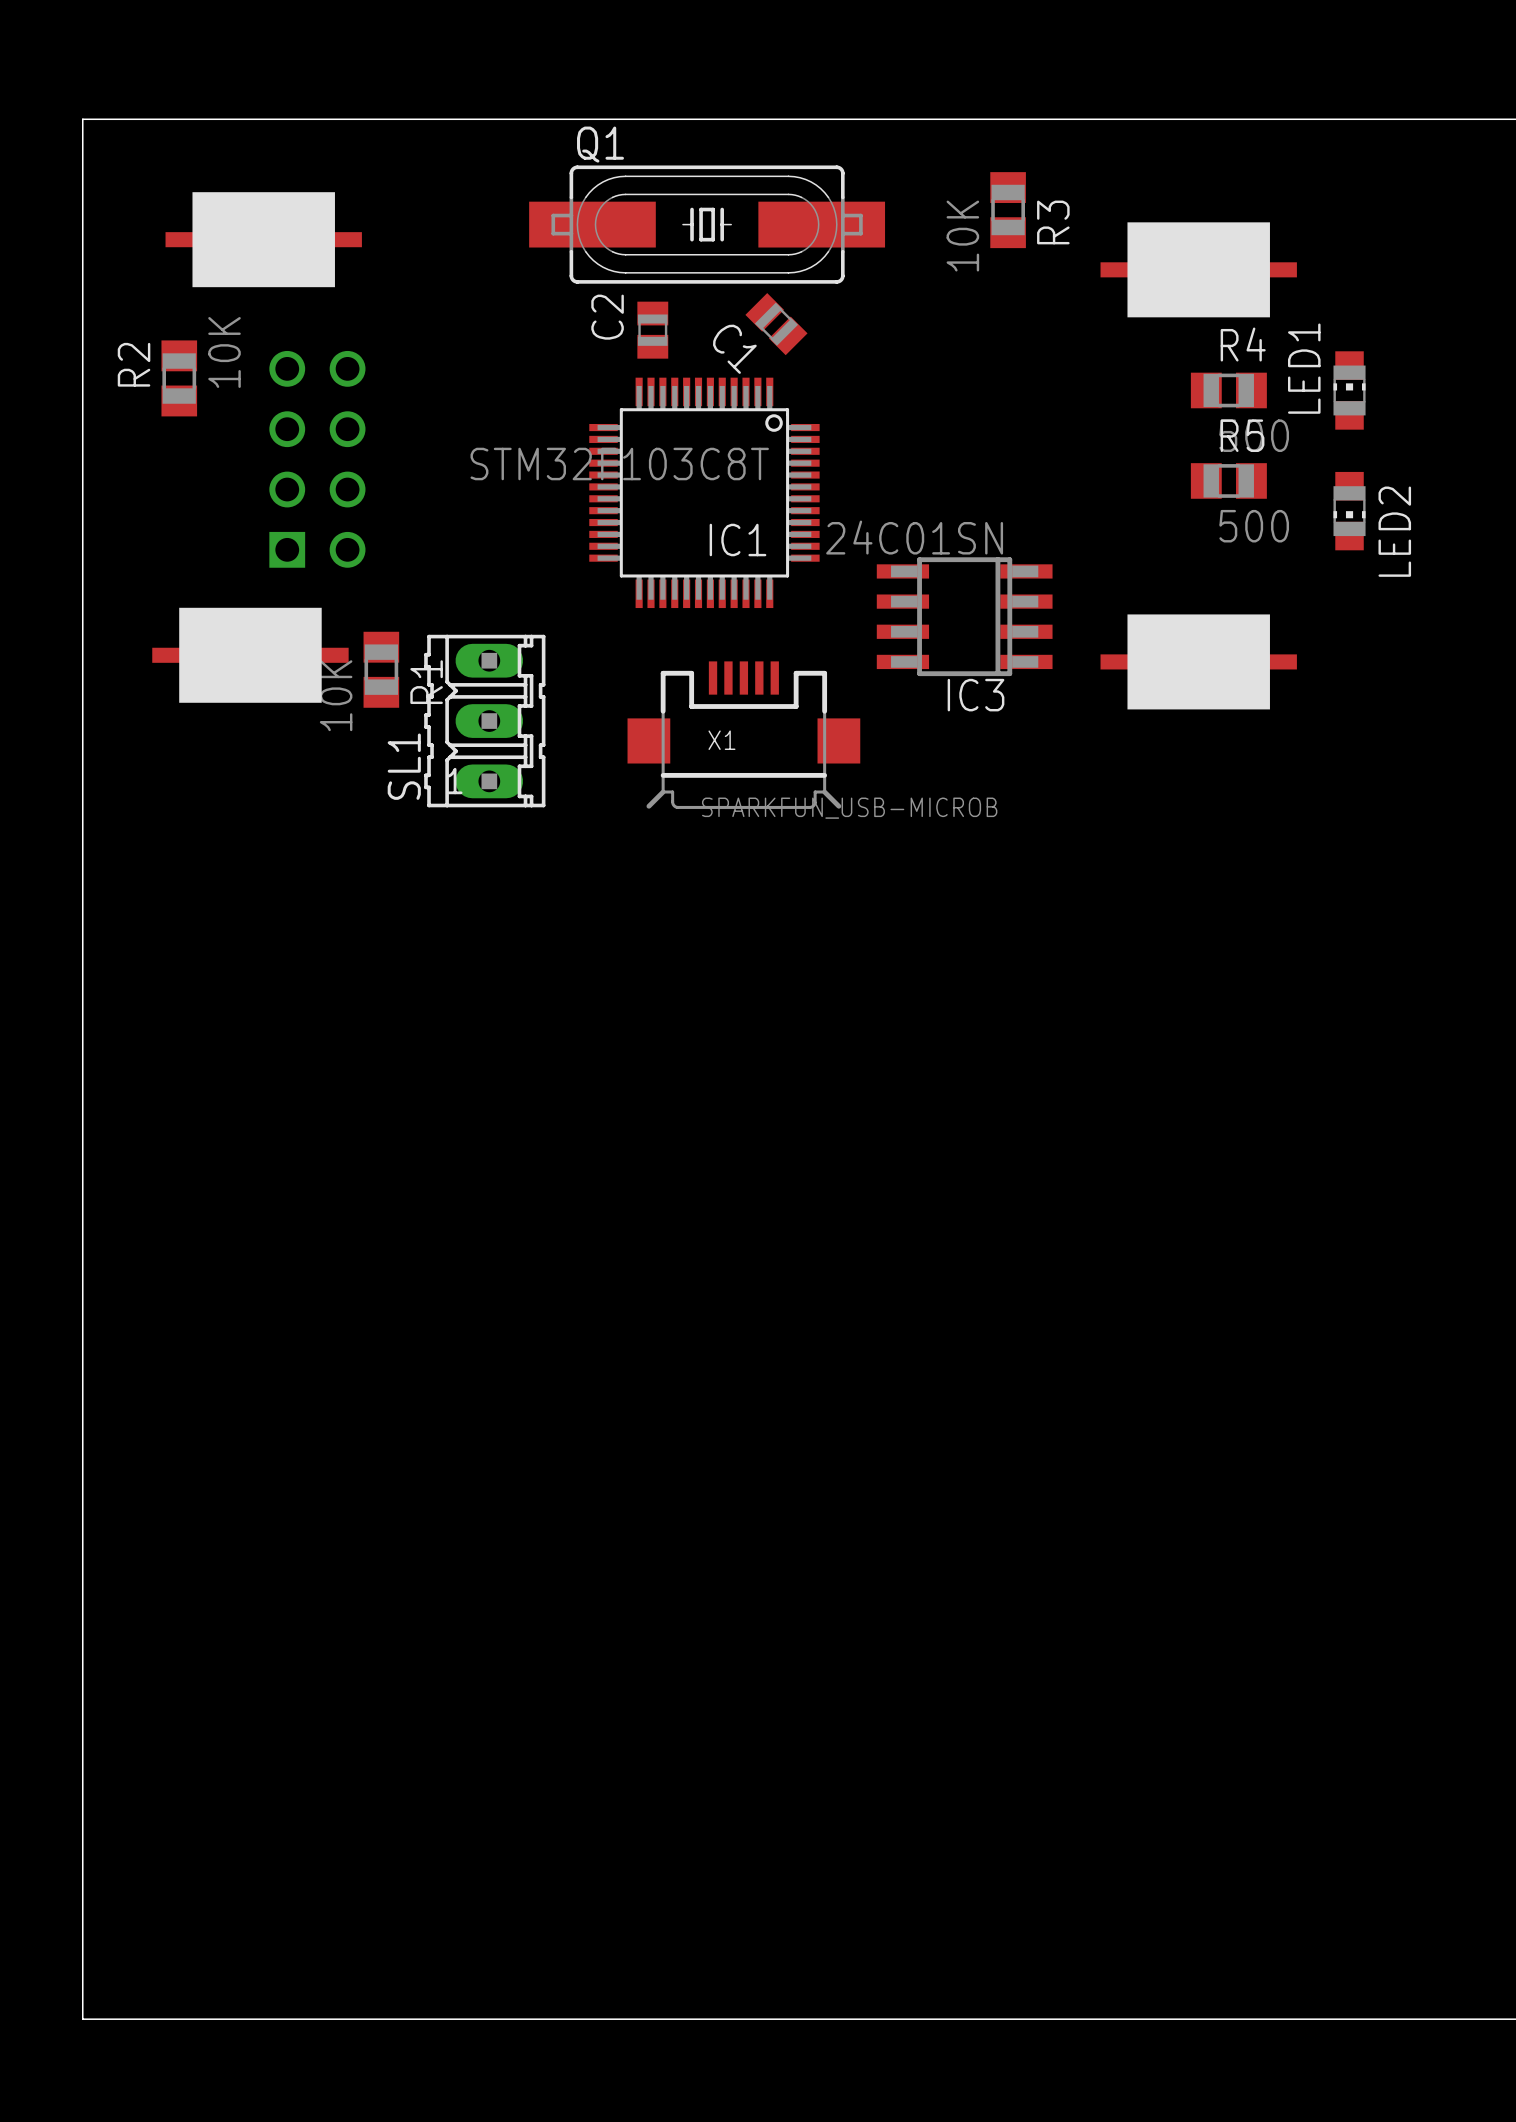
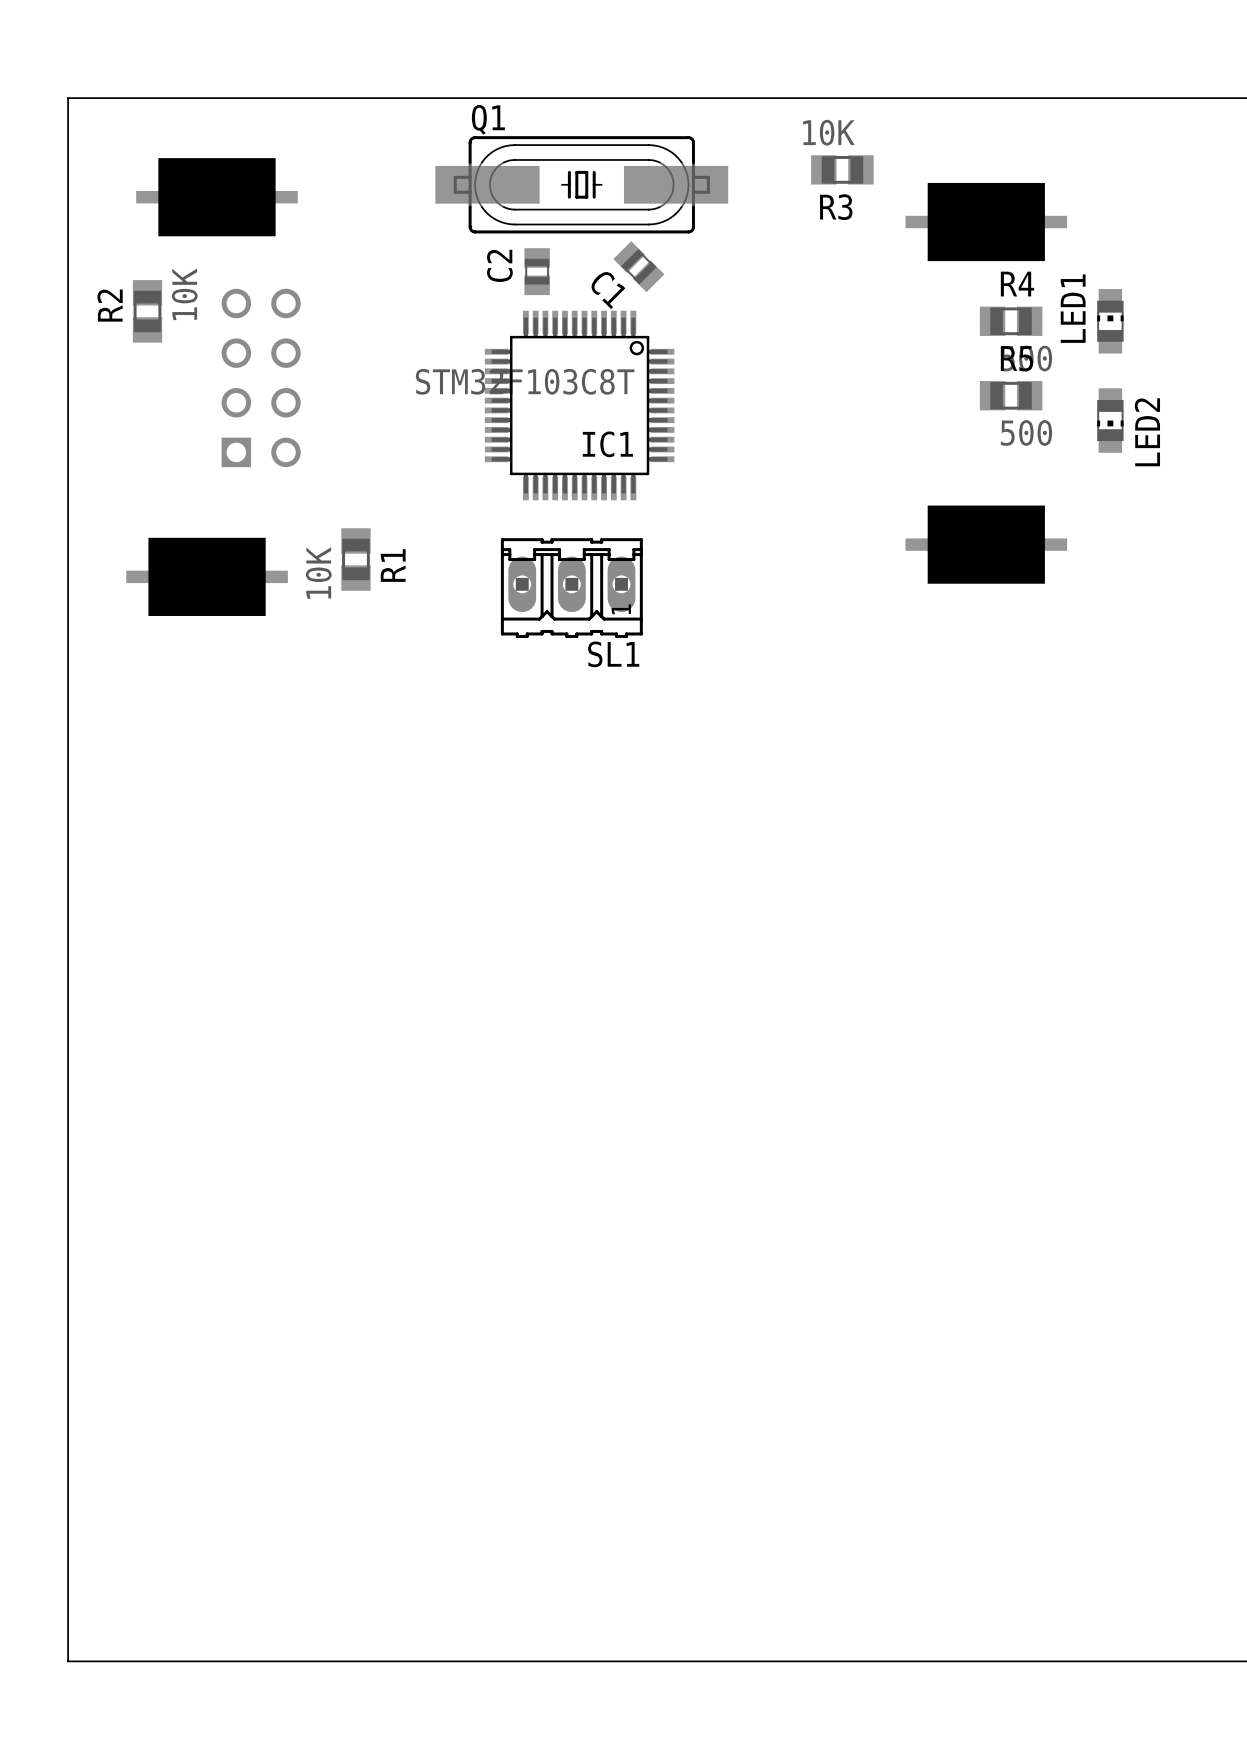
R3 rotation: 0° (1008, 210) -> 90° clockwise (842, 169)
IC3: 24C01SN (964, 616) -> none
part position: (250, 655) -> (207, 576)
R1 position: (381, 669) -> (355, 559)
SL1 rotation: 0° (484, 721) -> 90° counterclockwise (571, 588)
SL1 position: (484, 721) -> (571, 588)
X1: SPARKFUN_USB-MICROB (743, 735) -> none

